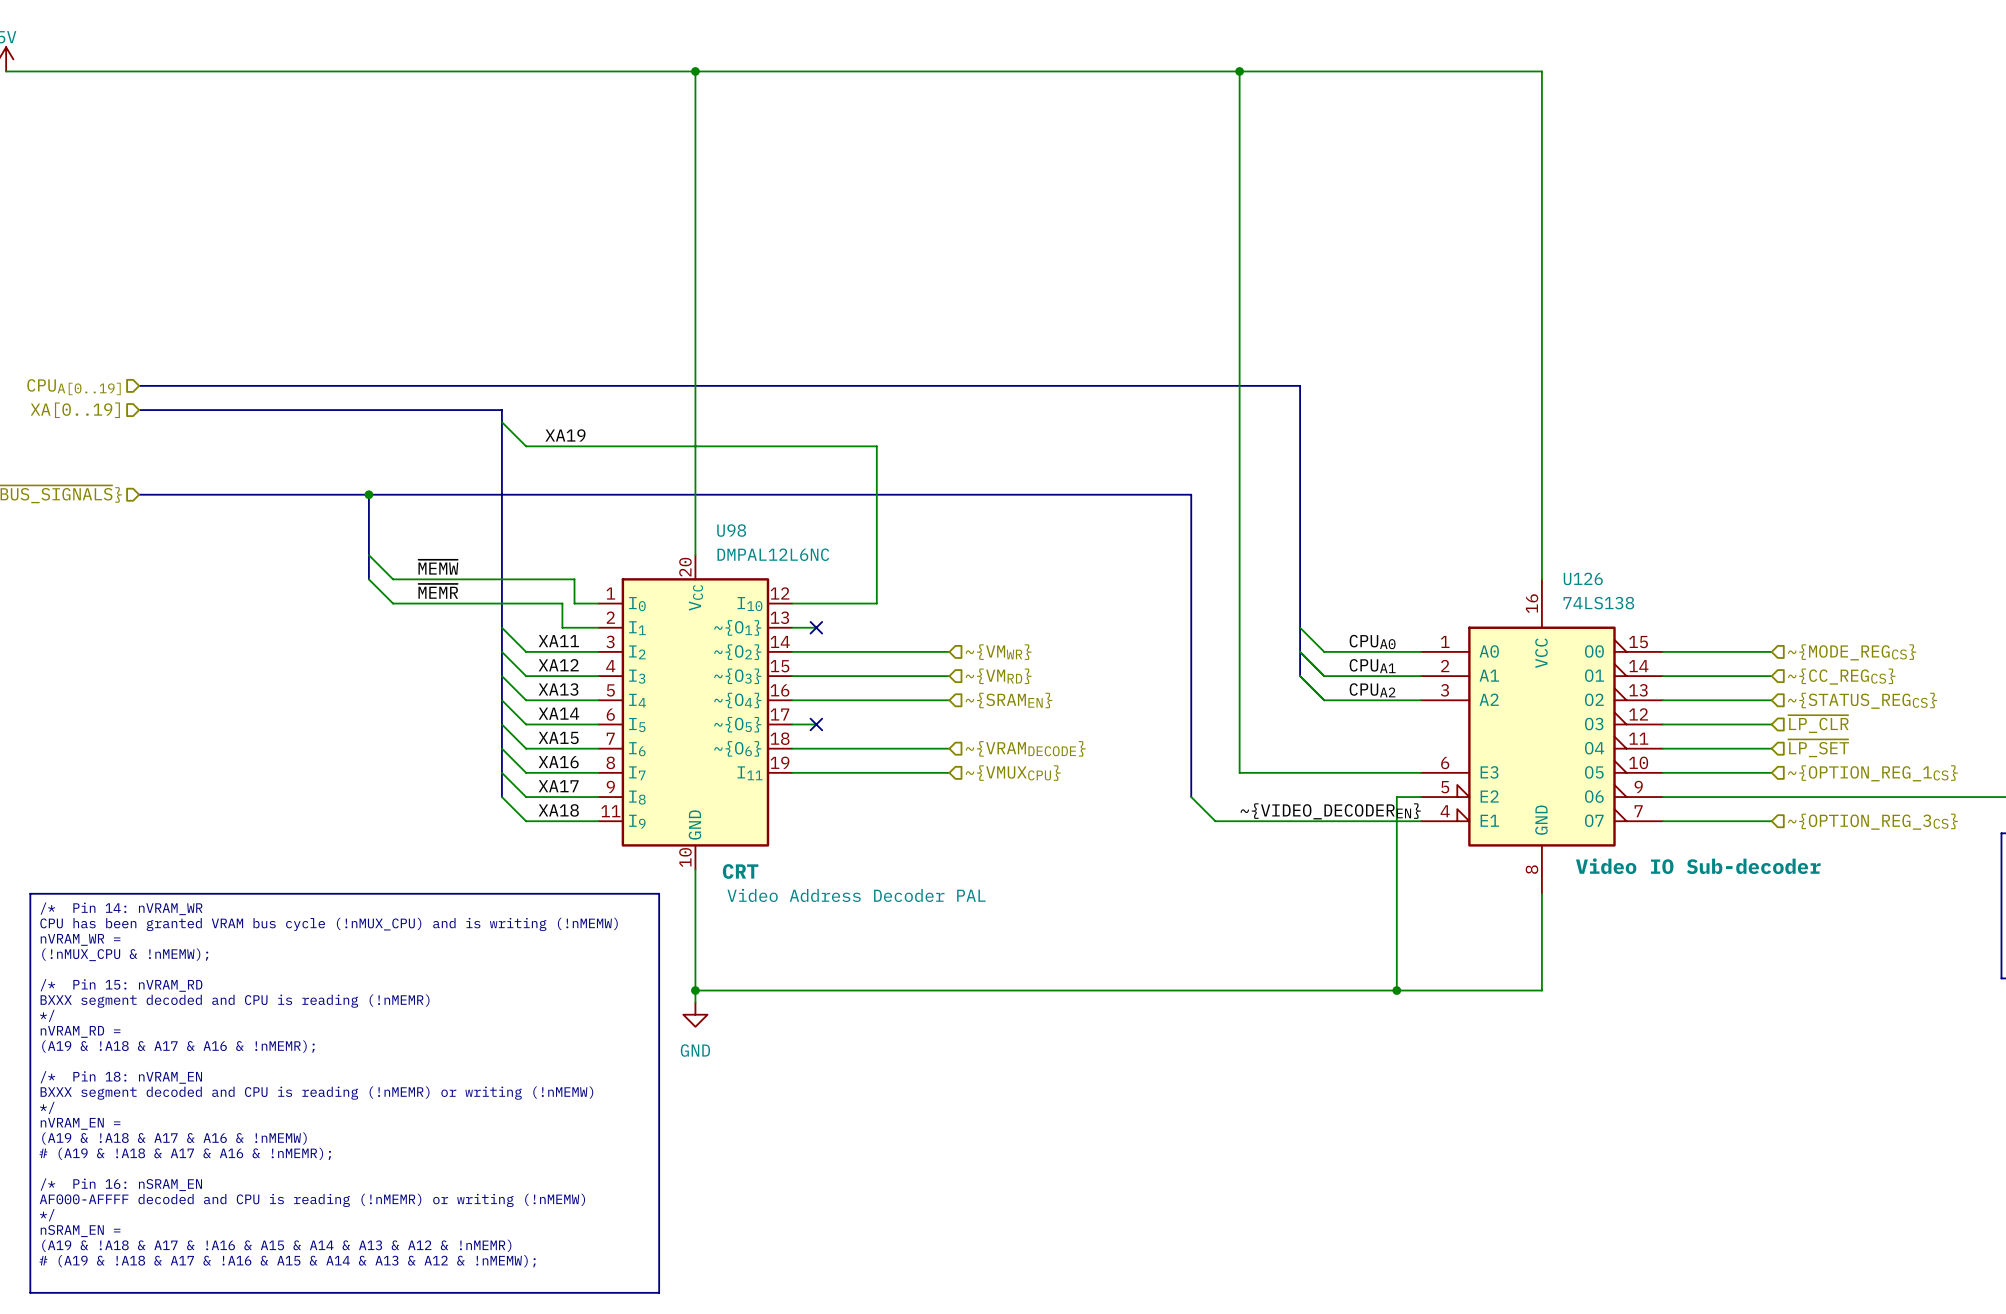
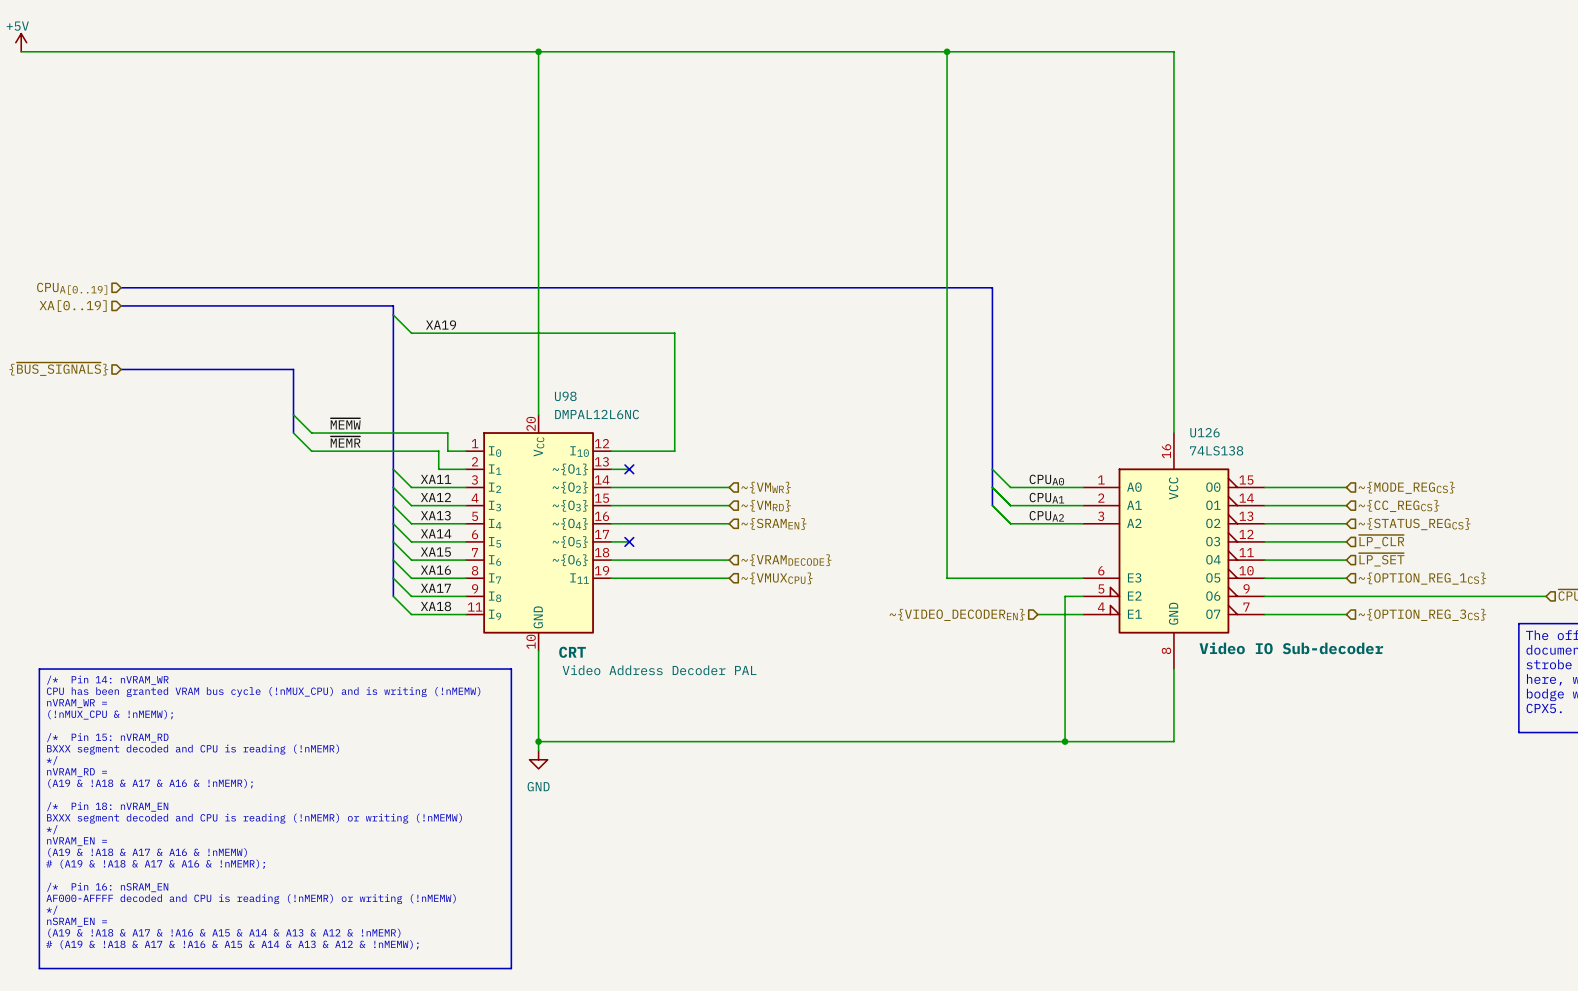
bus: (368, 494) (1191, 494) (1191, 797) -> none
junction: (368, 494) -> none
wire: (1191, 797) (1215, 821) (1360, 821) -> none
label: ~{VIDEO_DECODEREN} (1330, 811) -> none
hierarchical label: none -> ~{VIDEO_DECODEREN} (957, 614)

